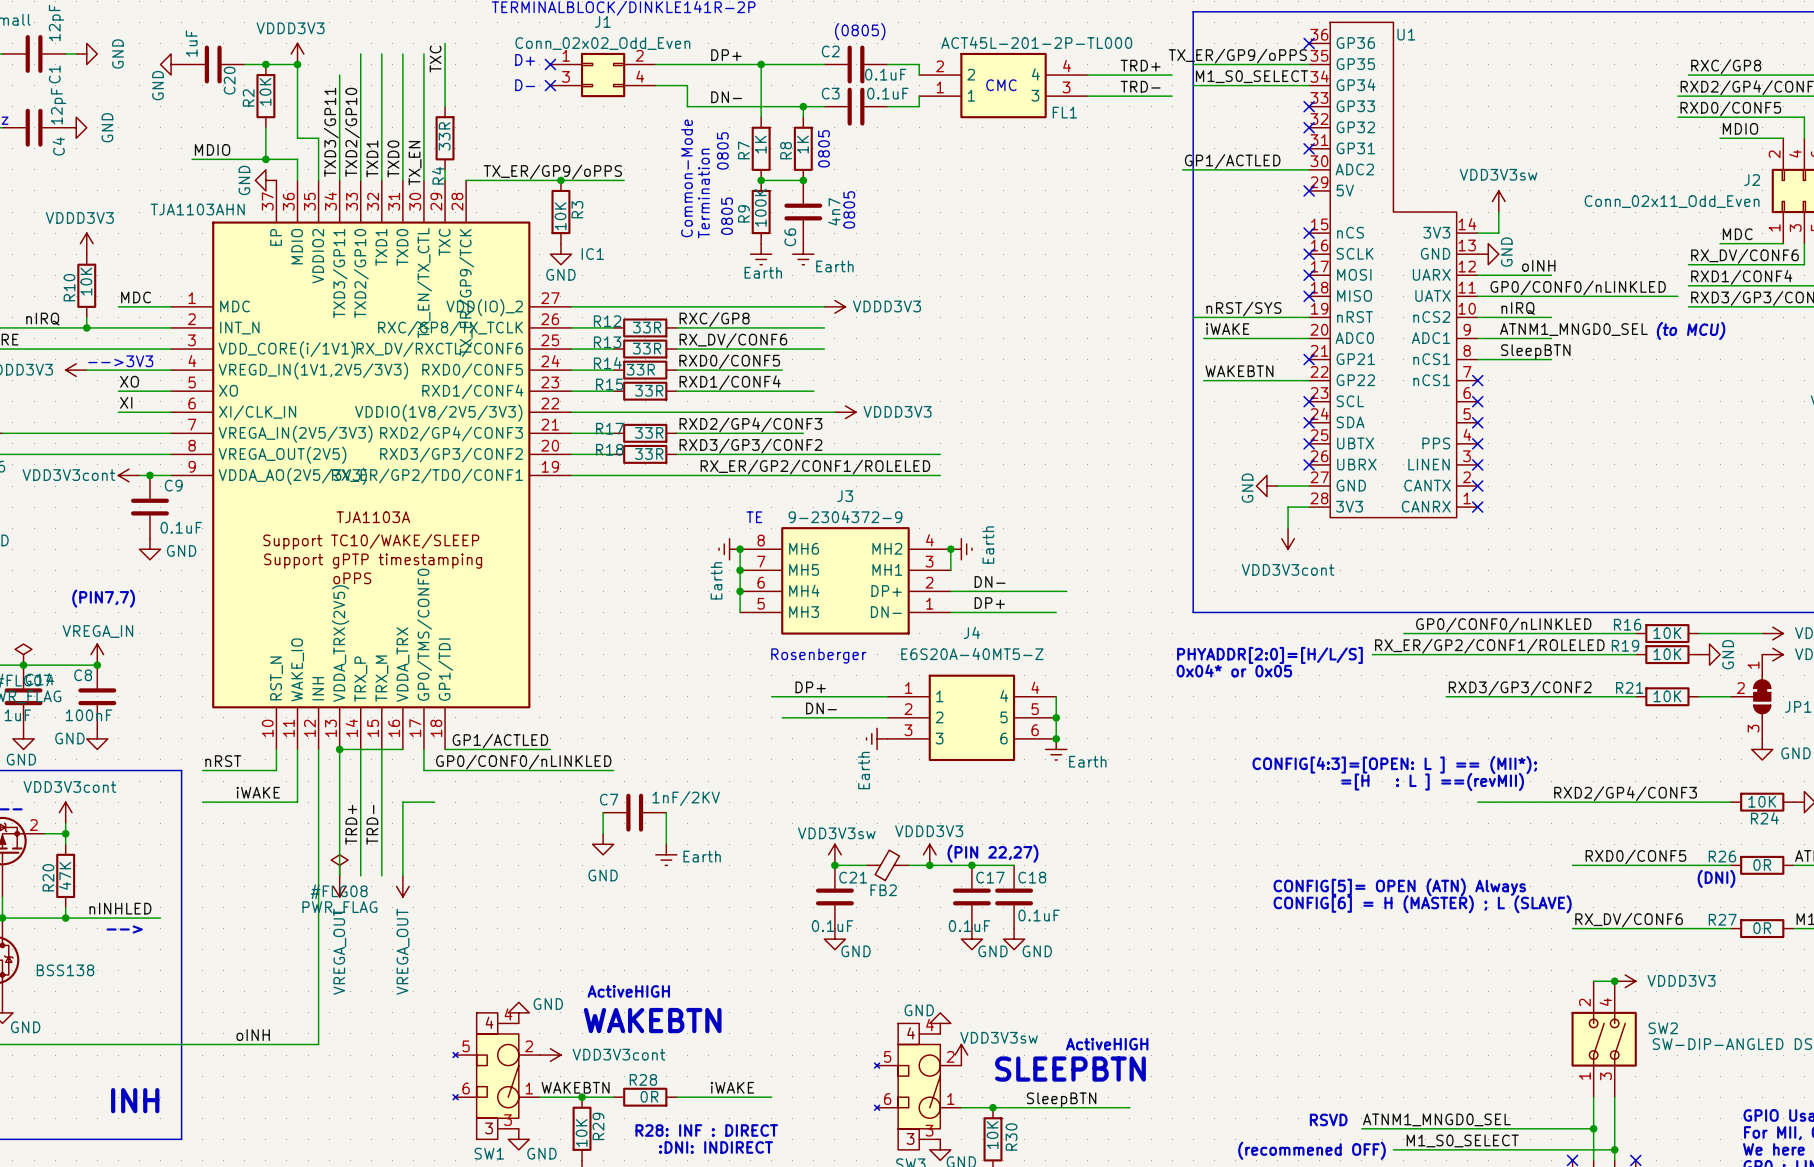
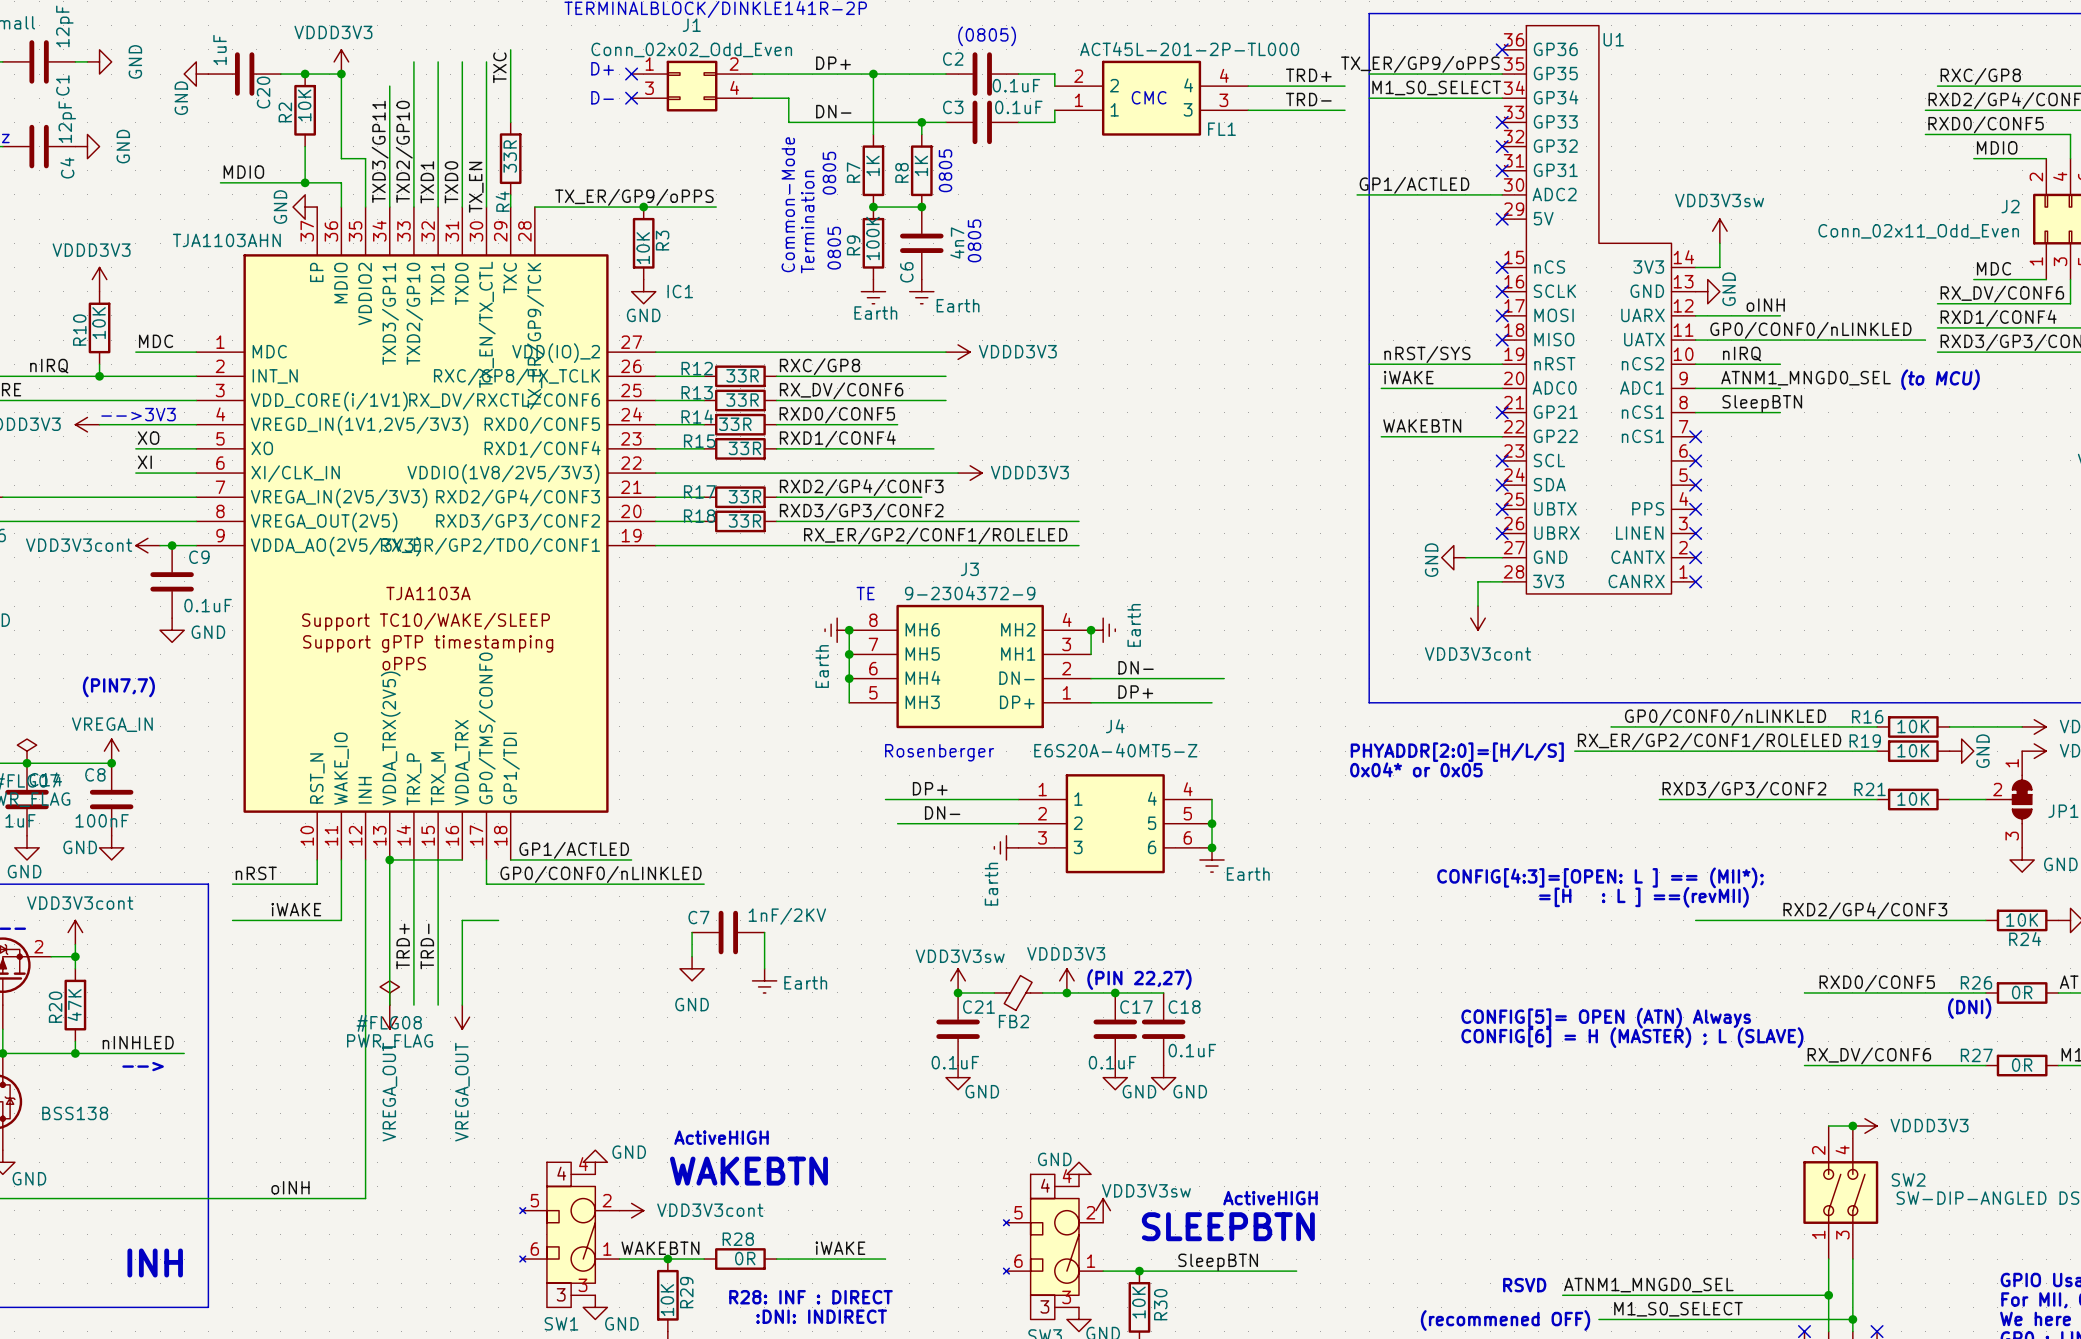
J3 pin name: DP+ (886, 590) -> DN- (1017, 678)
J3 pin name: DN- (886, 612) -> DP+ (1017, 702)

